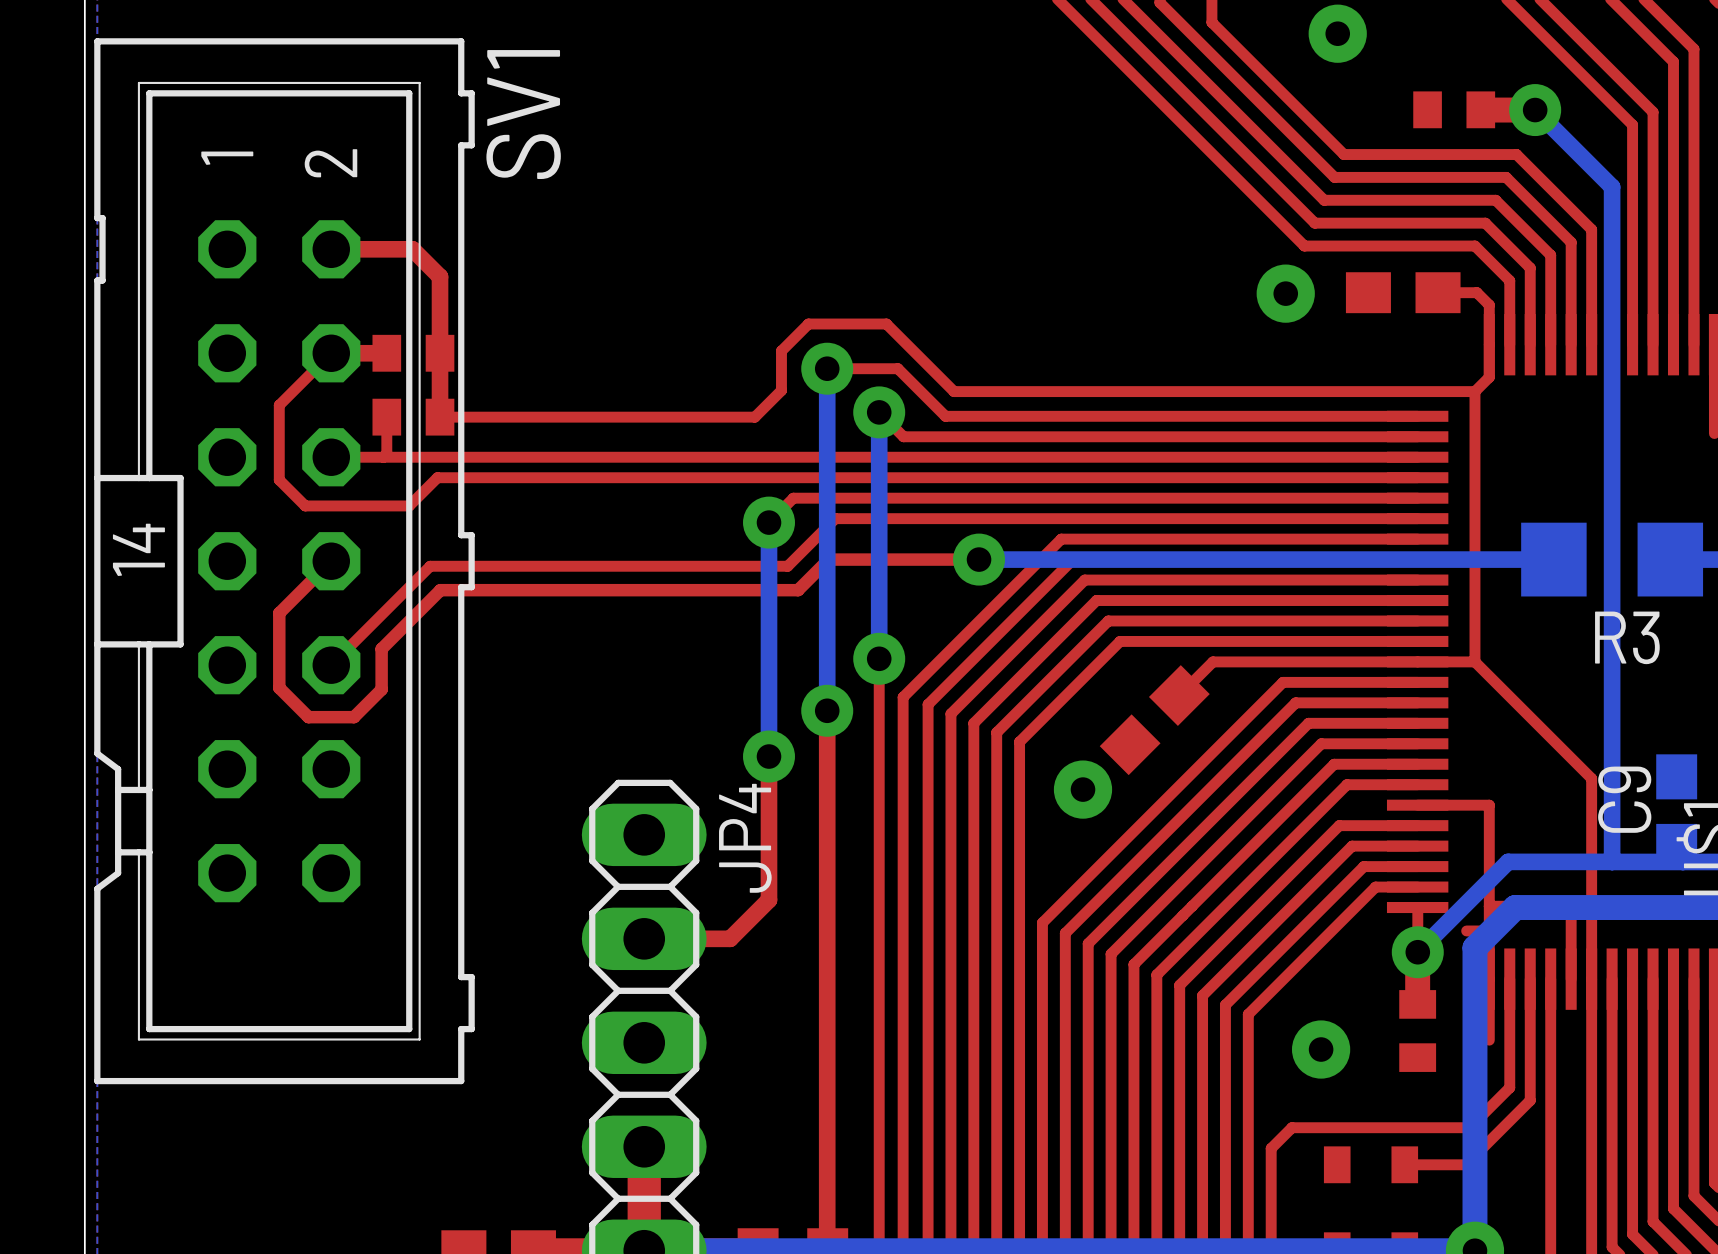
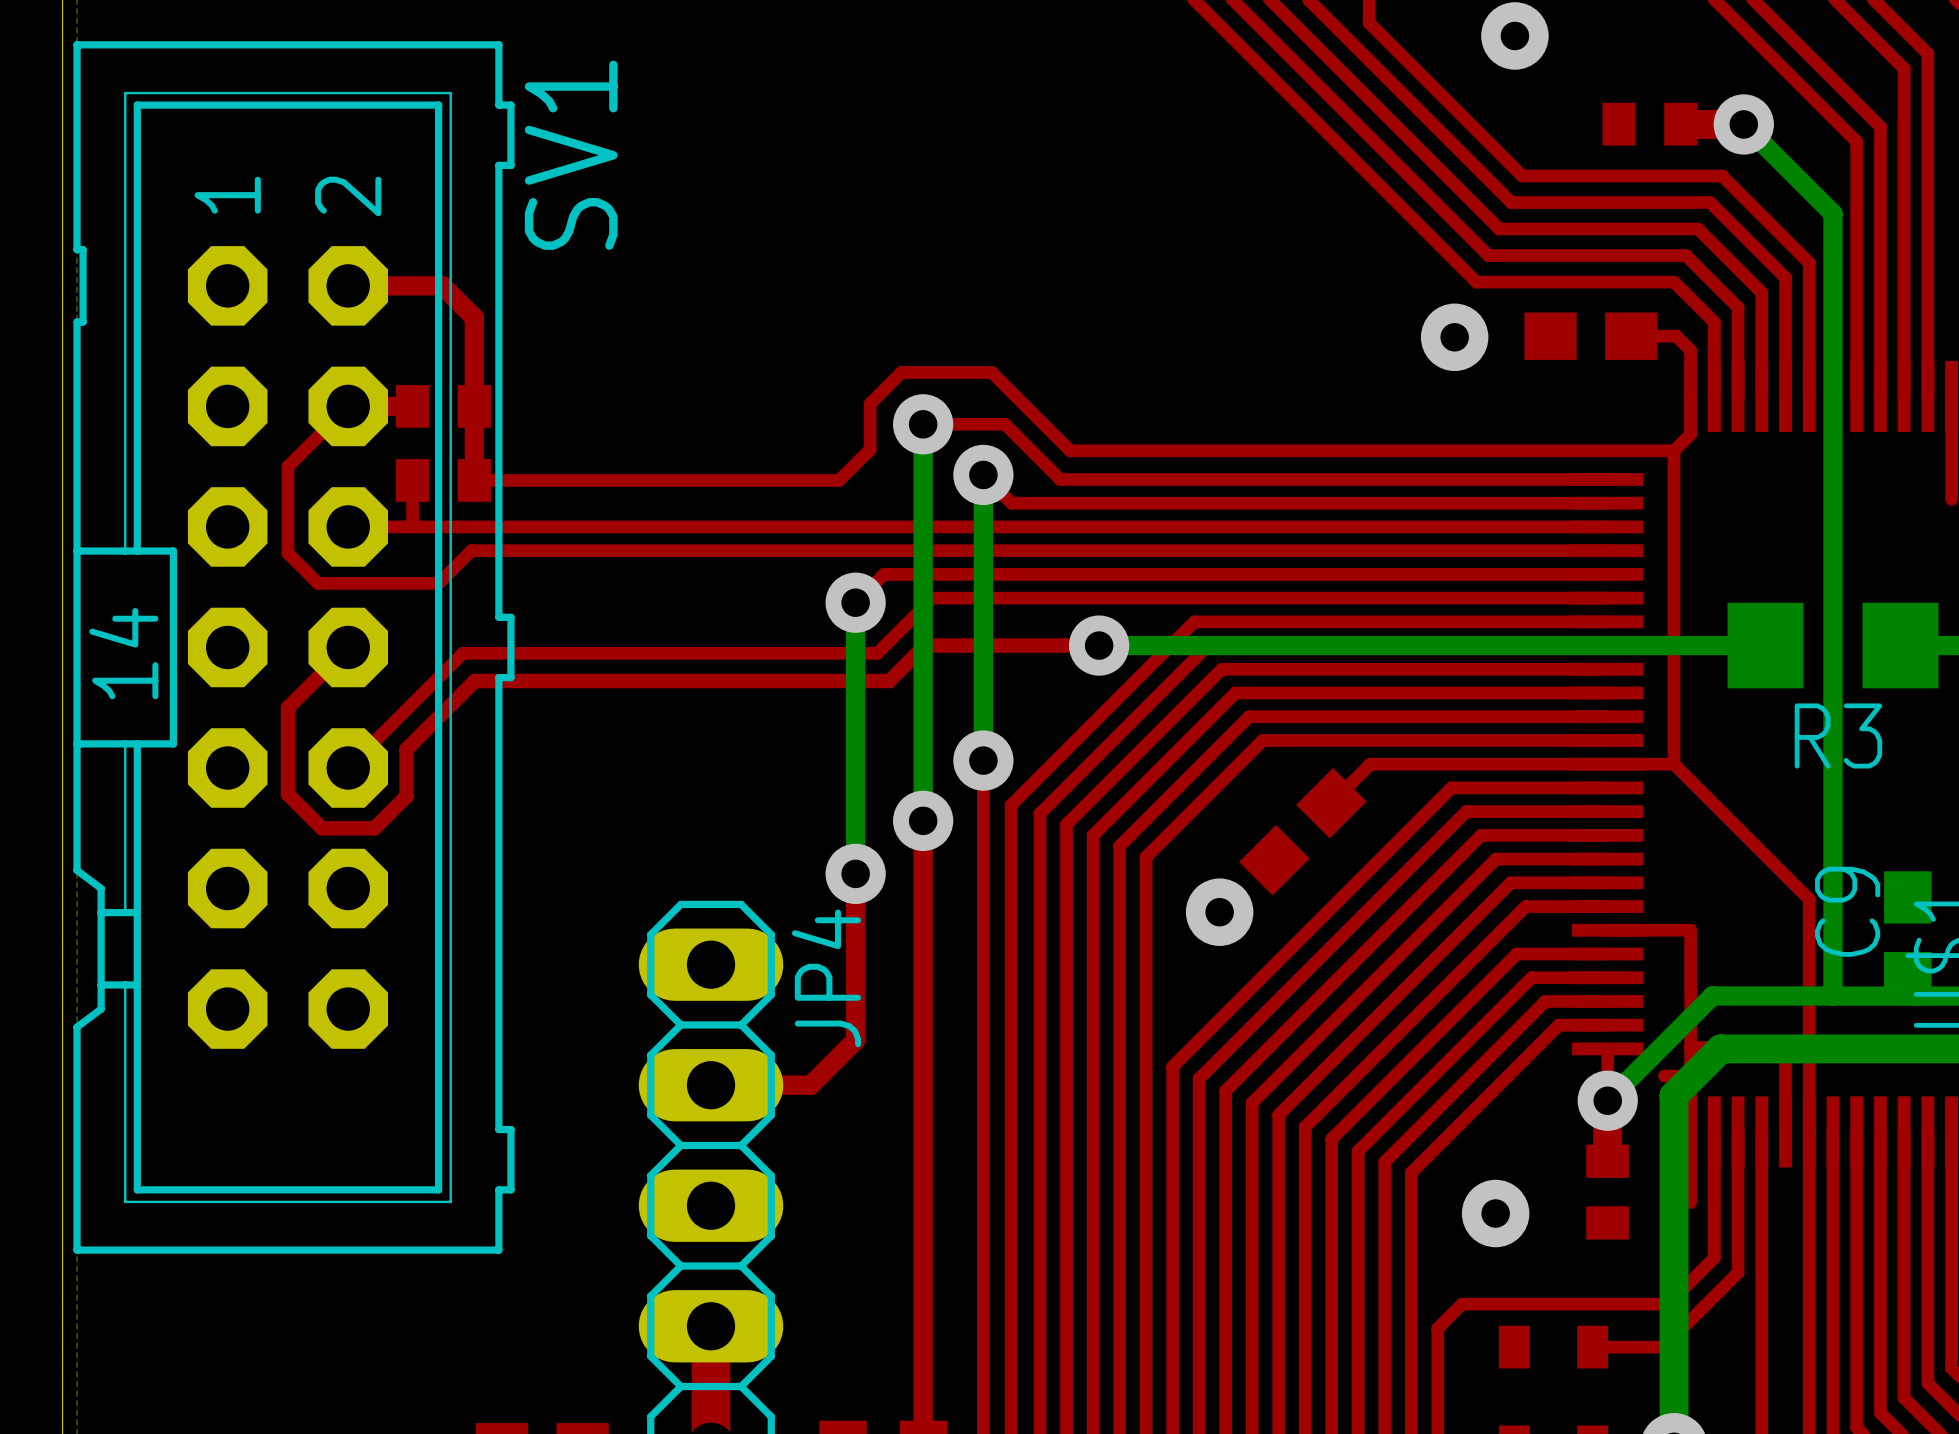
SV1 footprint: [94, 38, 475, 1085] -> [73, 41, 515, 1254]

